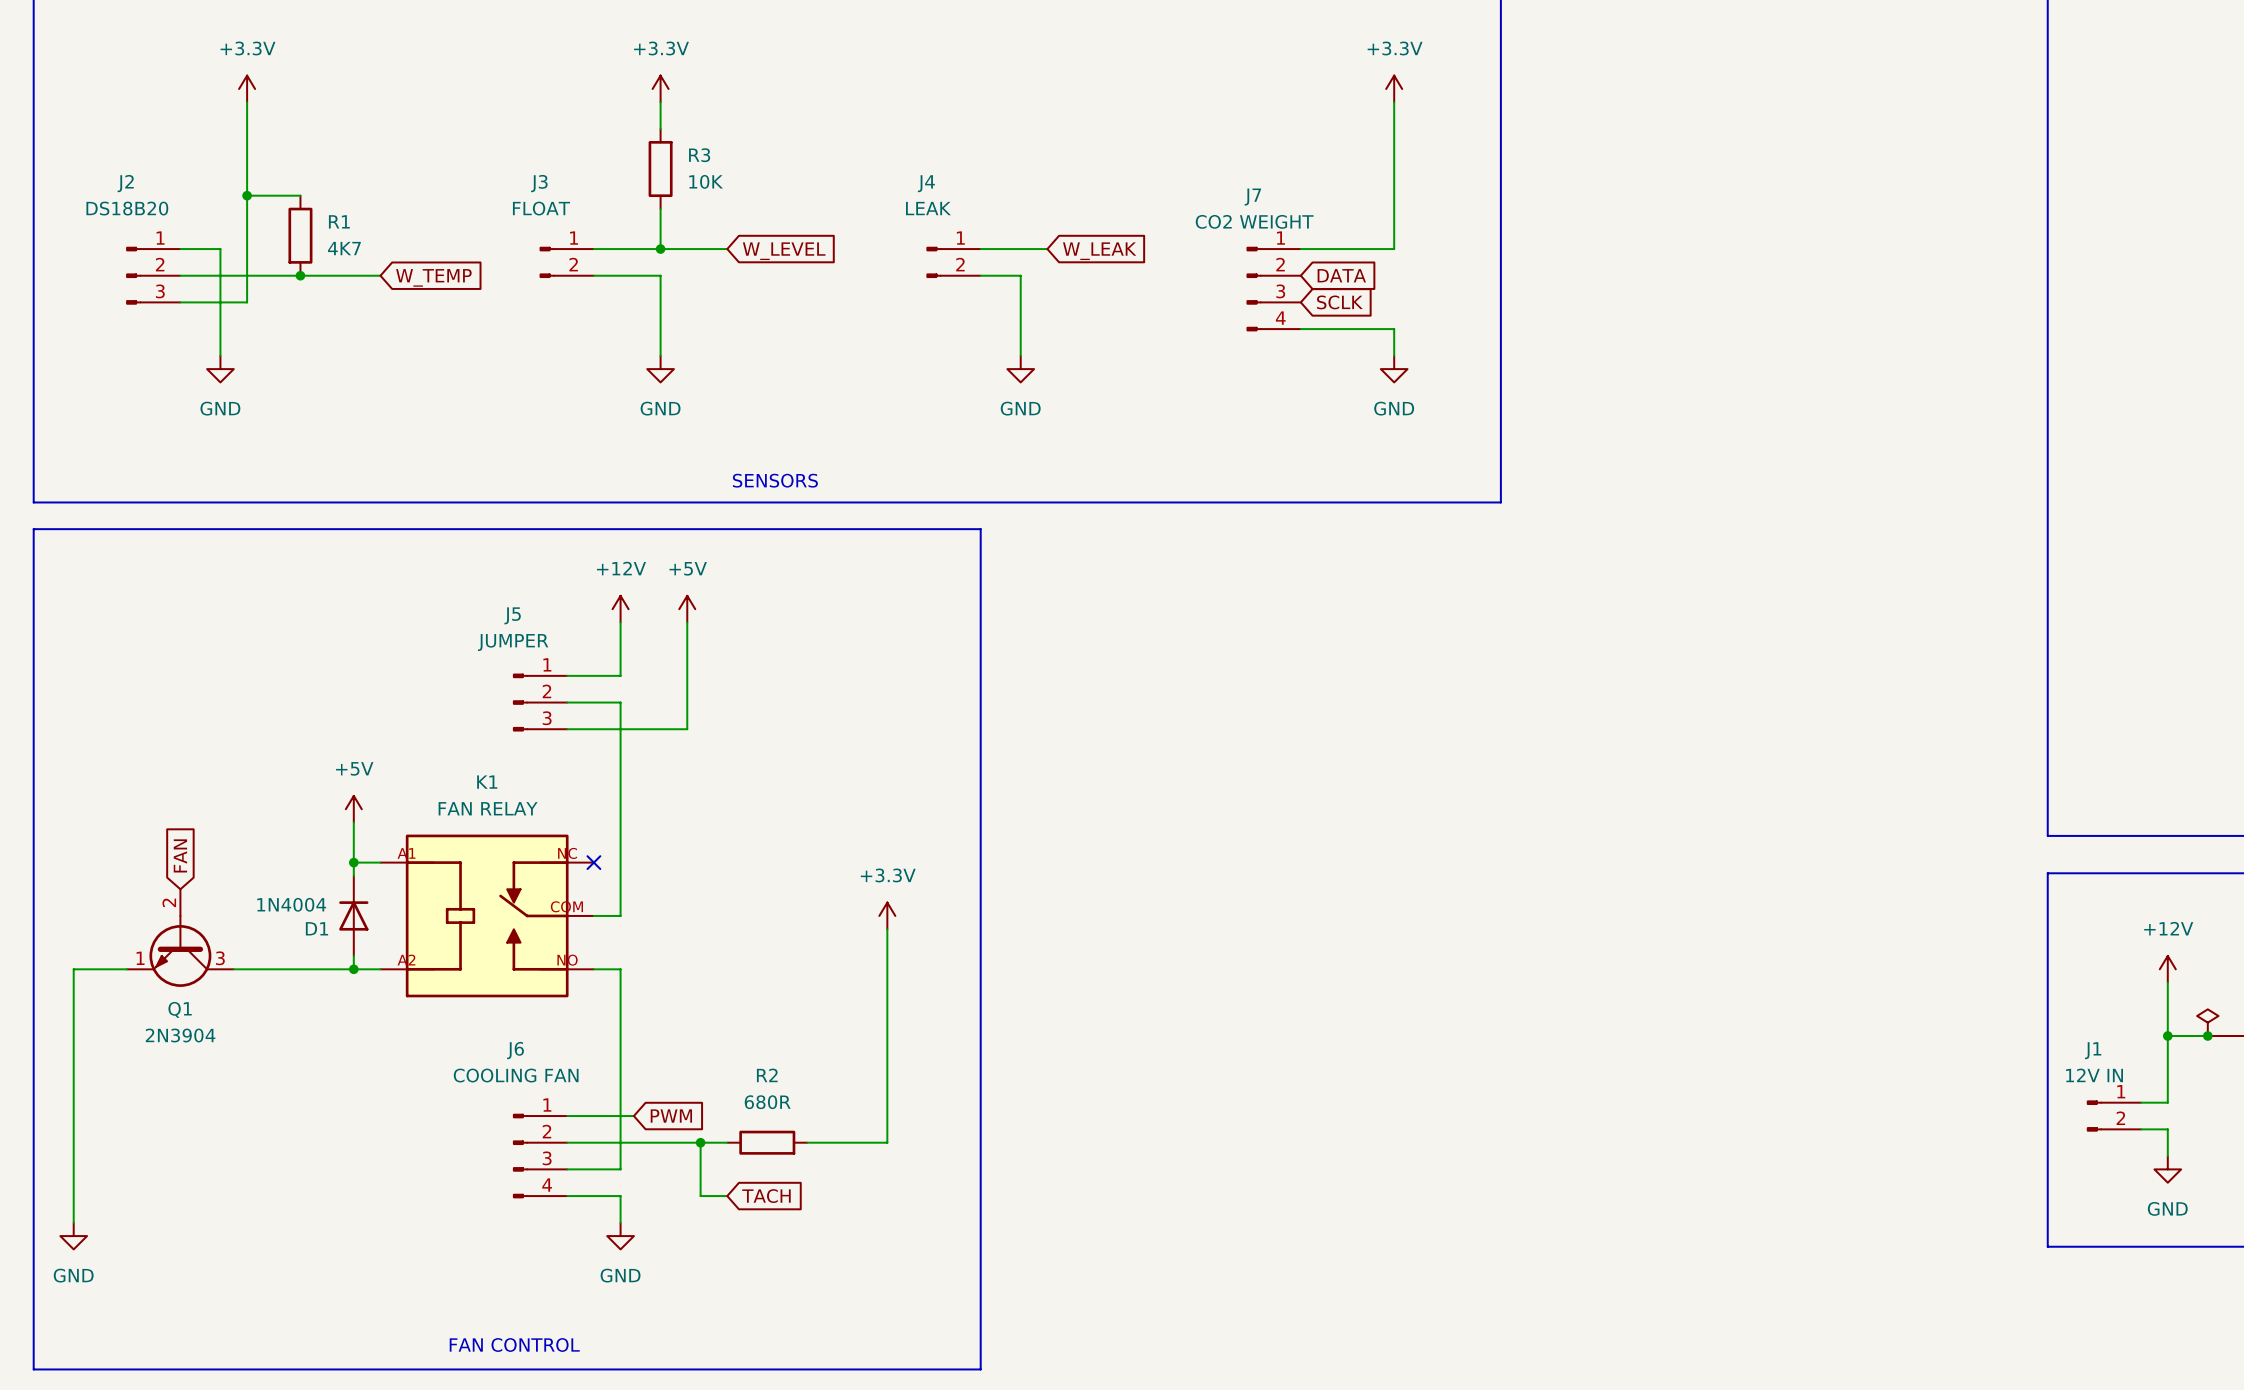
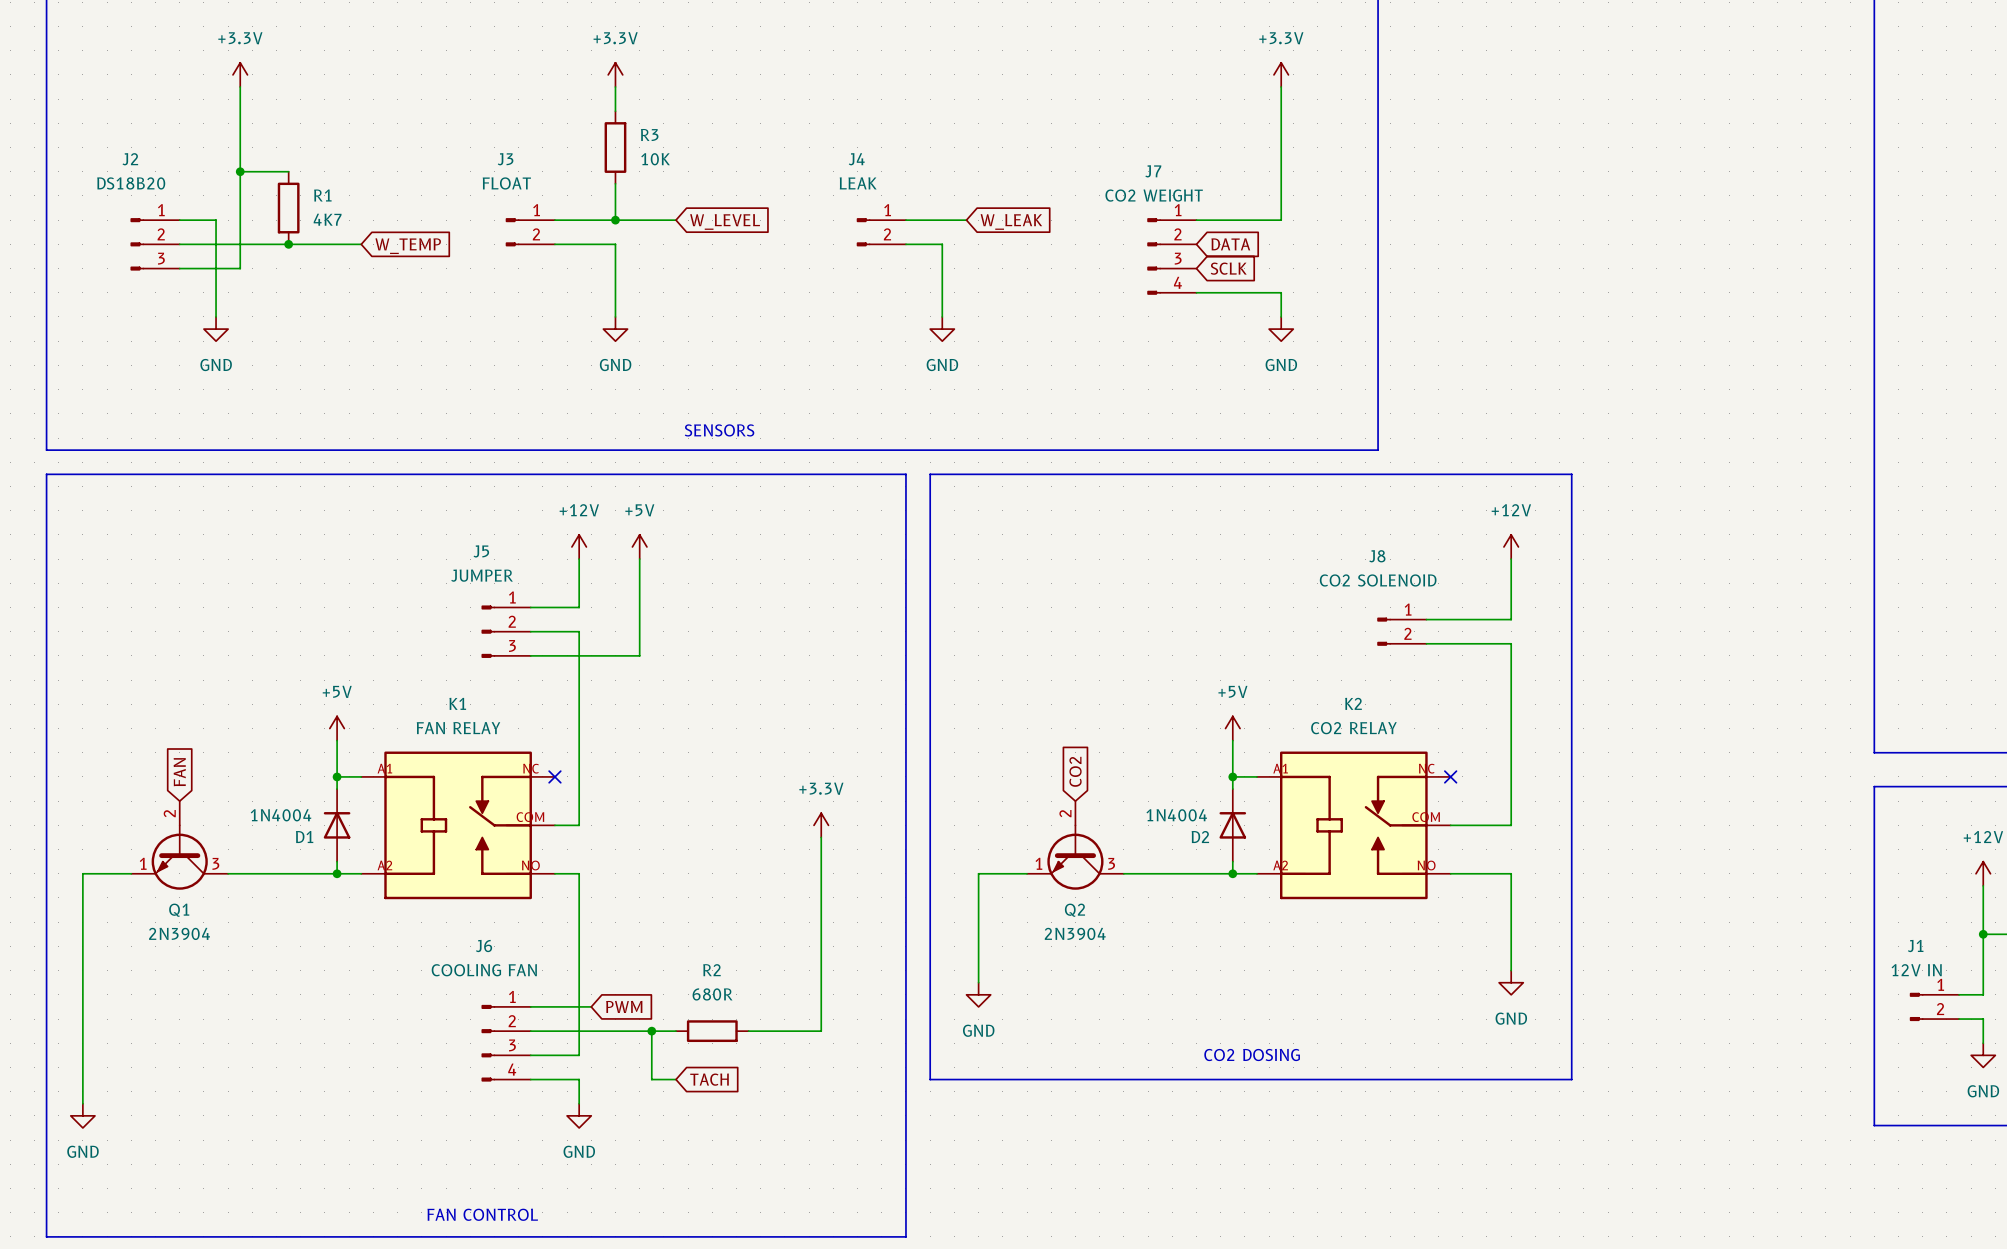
line: none -> (930, 474) (1571, 474) (1571, 1079) (930, 1079) (930, 474)
power symbol: none -> +12V (1511, 546)
wire: none -> (1511, 559) (1511, 619) (1426, 619)
J8: none -> CO2 SOLENOID (1401, 631)
wire: none -> (1426, 643) (1511, 643) (1511, 825) (1450, 825)
power symbol: none -> +5V (1232, 728)
wire: none -> (1232, 740) (1232, 789)
global label: none -> CO2 (1075, 771)
wire: none -> (1232, 776) (1257, 776)
junction: none -> (1232, 776)
no-connect mark: none -> (1450, 776)
D2: none -> 1N4004 (1232, 825)
K2: none -> CO2 RELAY (1353, 825)
Q2: none -> 2N3904 (1075, 845)
wire: none -> (1232, 861) (1232, 873)
wire: none -> (1027, 873) (978, 873) (978, 982)
wire: none -> (1123, 873) (1257, 873)
junction: none -> (1232, 873)
wire: none -> (1450, 873) (1511, 873) (1511, 970)
power symbol: none -> GND (1511, 982)
power symbol: none -> GND (978, 994)
text: none -> CO2 DOSING (1252, 1055)

